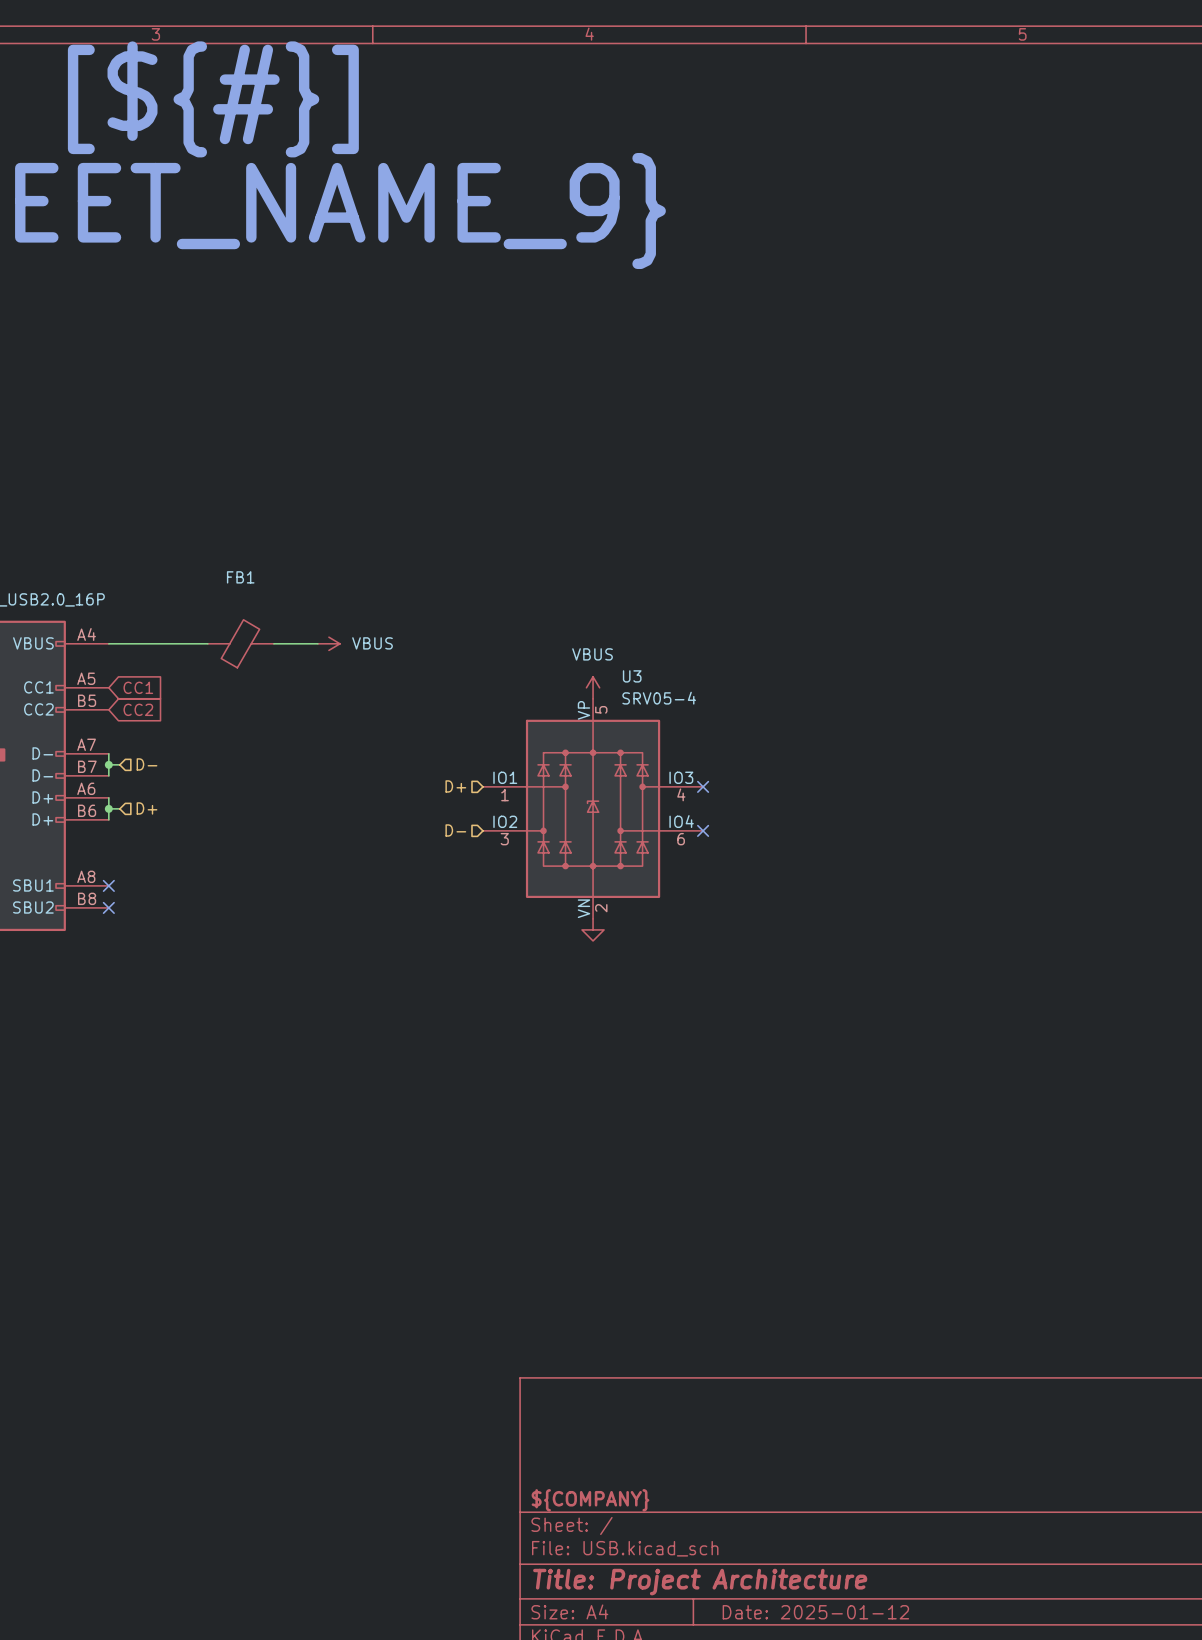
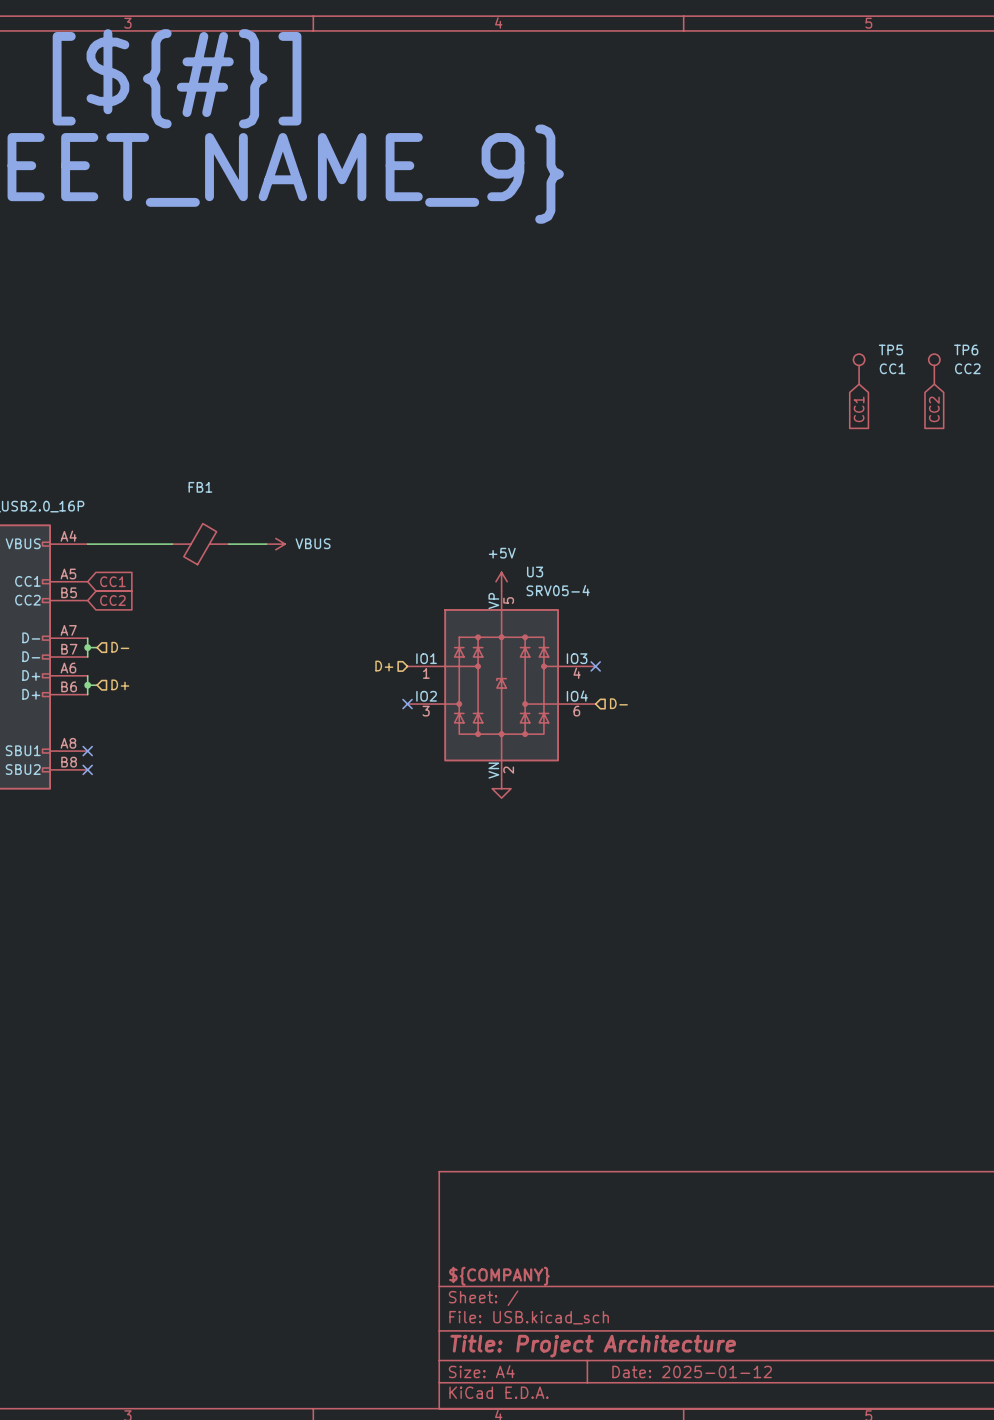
TP5: none -> CC1 (859, 369)
TP6: none -> CC2 (934, 369)
global label: none -> CC1 (859, 409)
global label: none -> CC2 (934, 409)
power symbol: VBUS (593, 687) -> +5V (501, 581)
hierarchical label: D- (455, 830) -> none
no-connect mark: none -> (407, 704)
no-connect mark: (703, 830) -> none
hierarchical label: none -> D- (618, 703)

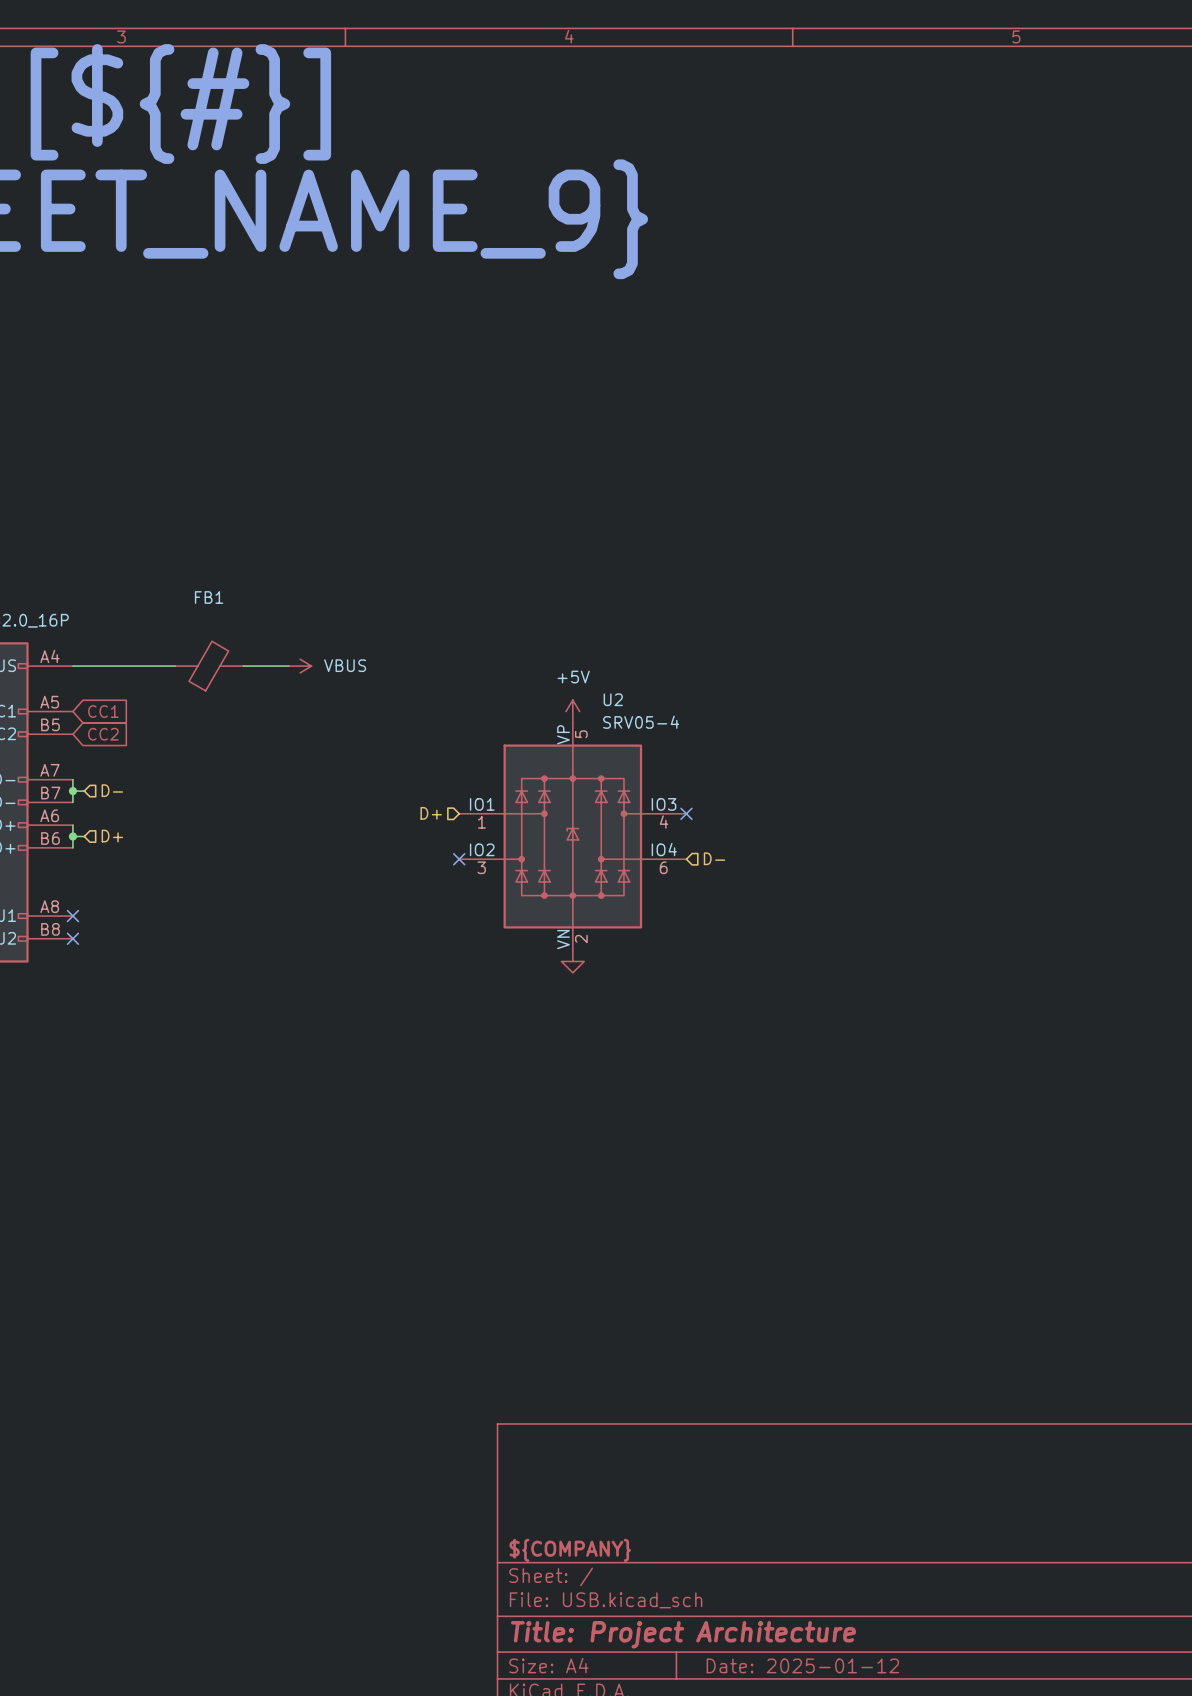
TP5: CC1 (859, 369) -> none
TP6: CC2 (934, 369) -> none
global label: CC1 (859, 409) -> none
global label: CC2 (934, 409) -> none
U3 name: U3 (535, 571) -> U2 (613, 699)

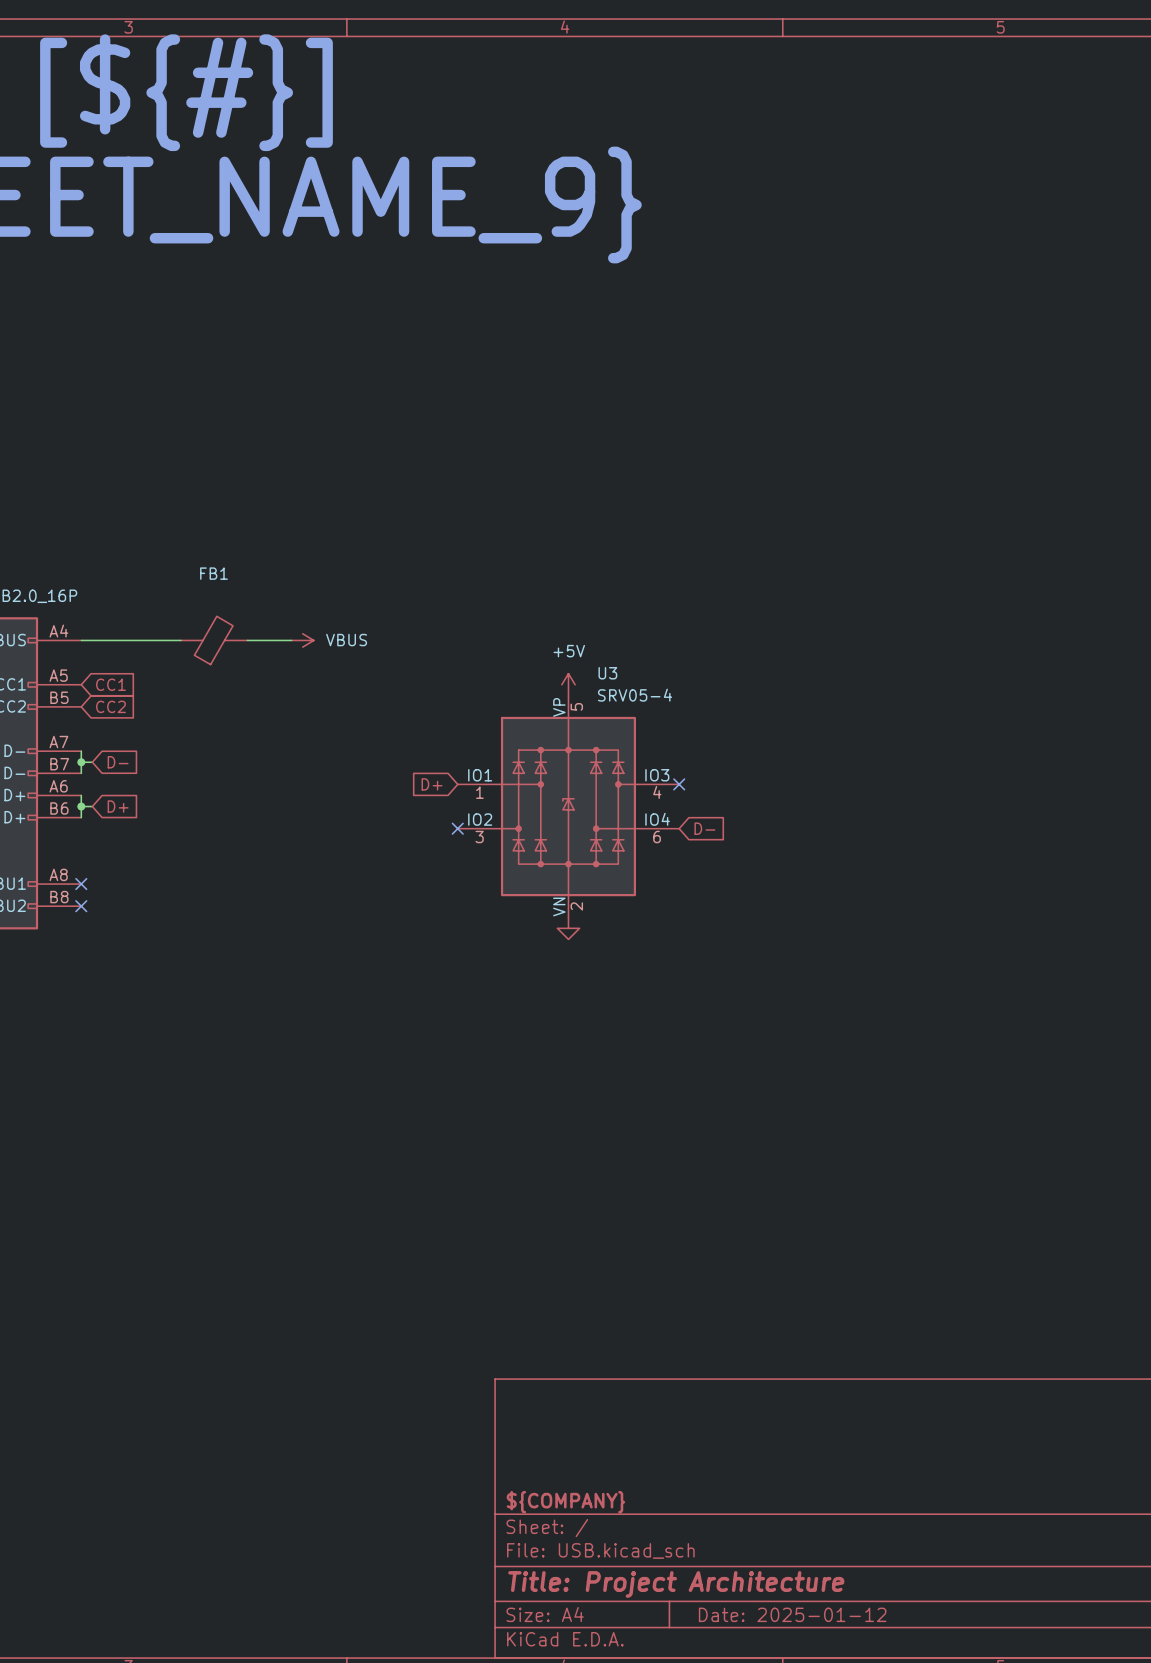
U2 name: U2 (613, 699) -> U3 (607, 673)
hierarchical label: D- (112, 790) -> none
global label: none -> D- (118, 762)
hierarchical label: D+ (431, 813) -> none
global label: none -> D+ (432, 784)
global label: none -> D+ (118, 806)
hierarchical label: D+ (112, 836) -> none
hierarchical label: D- (714, 858) -> none
global label: none -> D- (704, 828)

